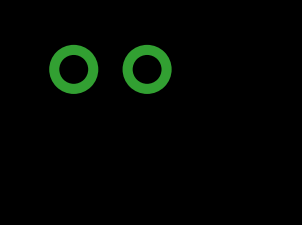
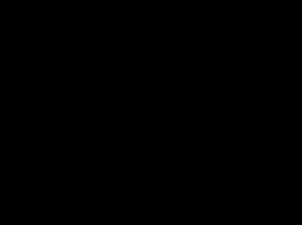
part: (110, 69) -> none

